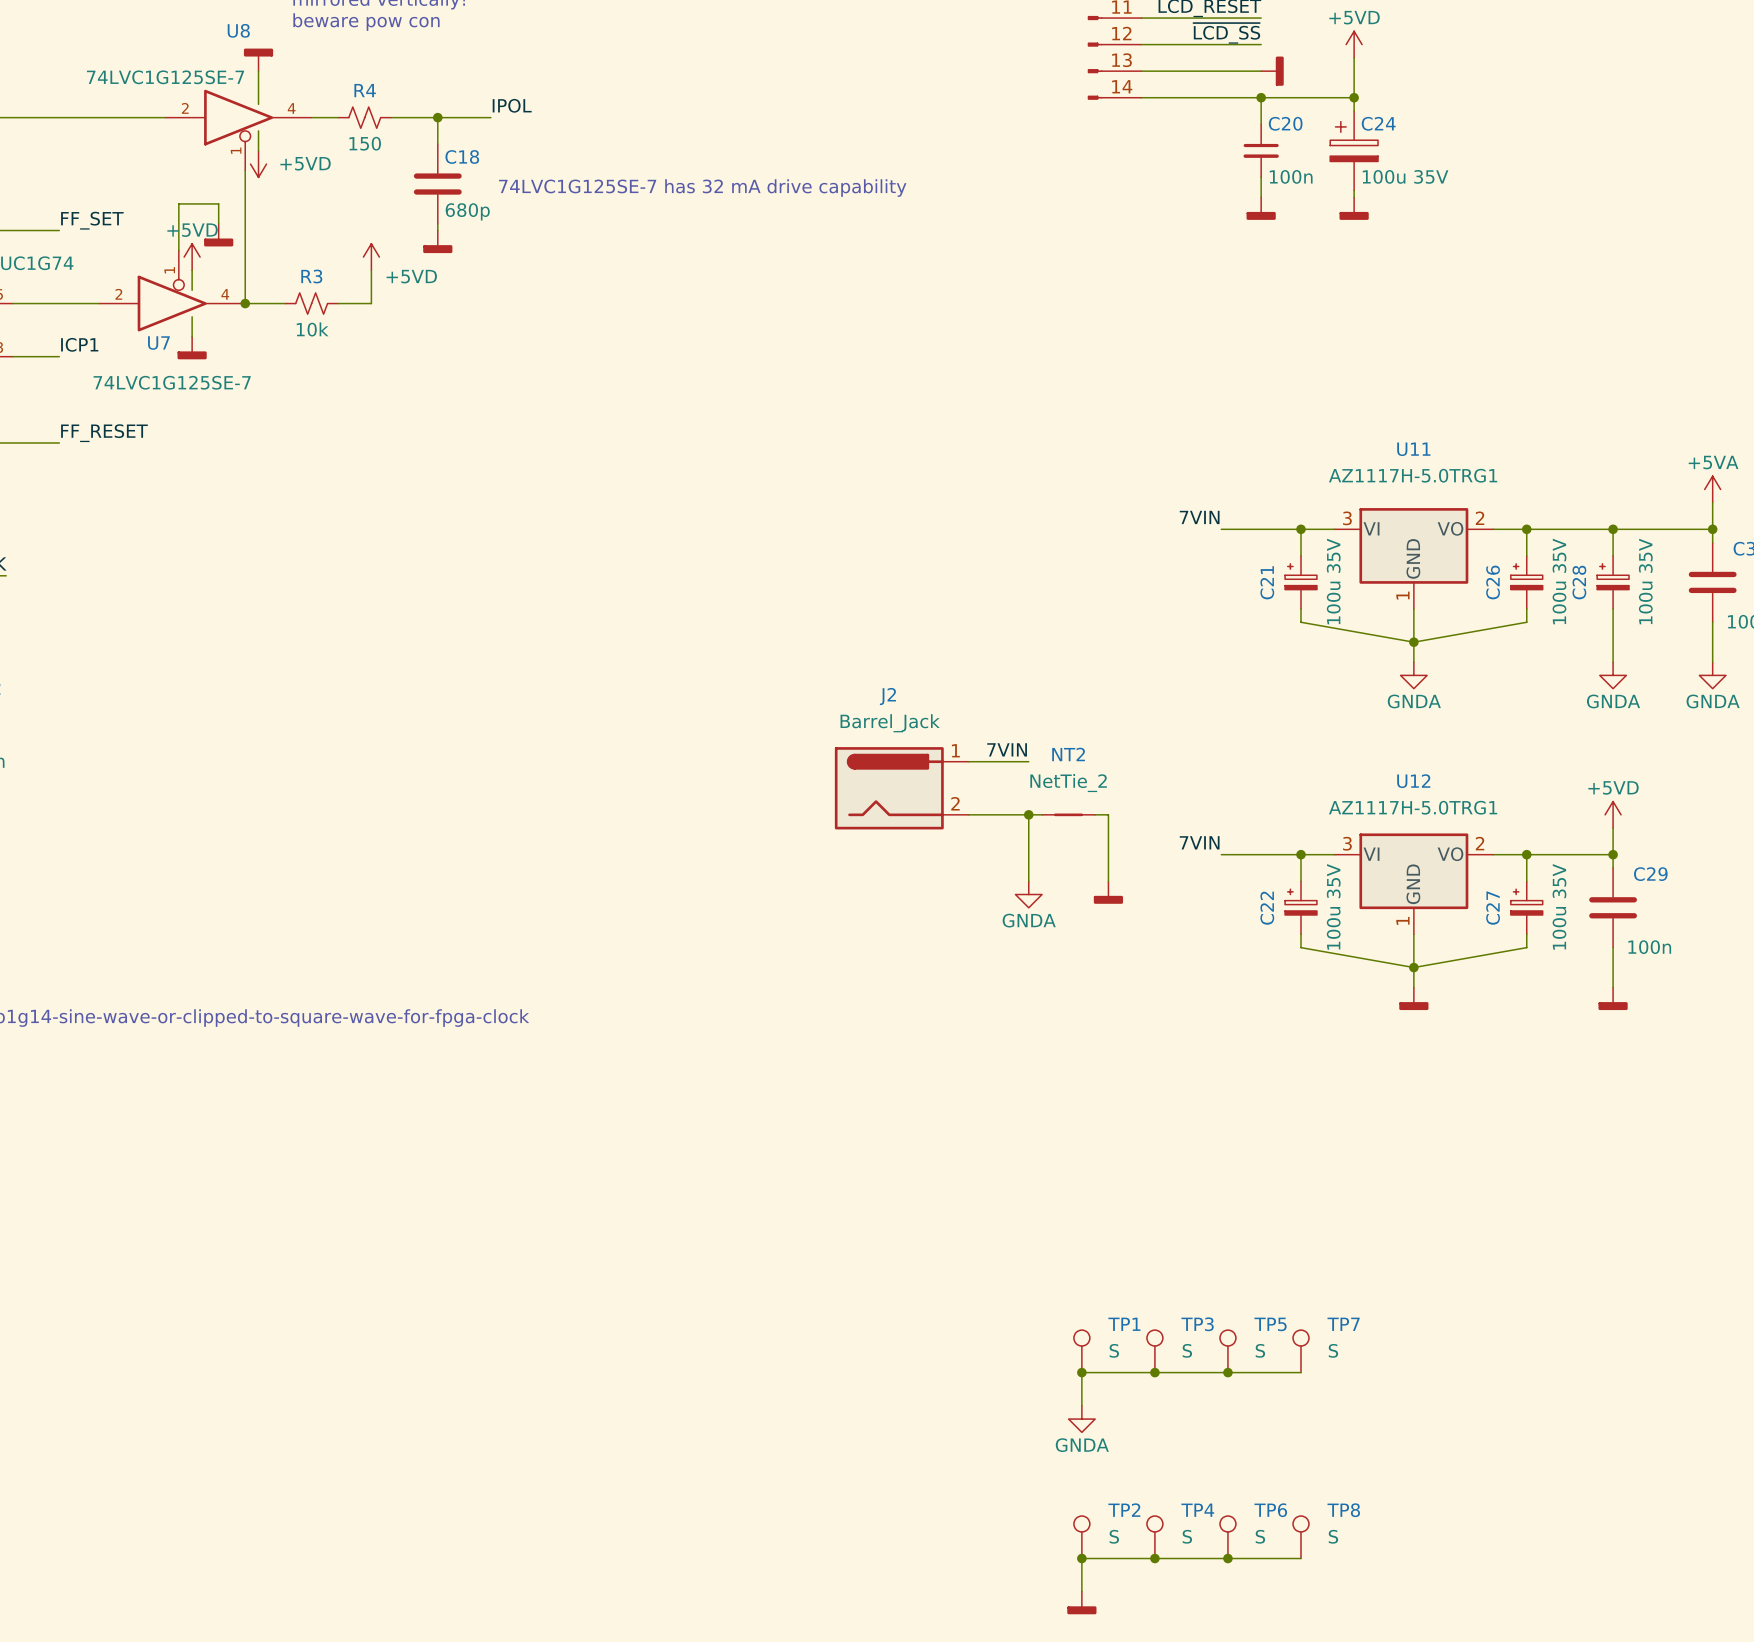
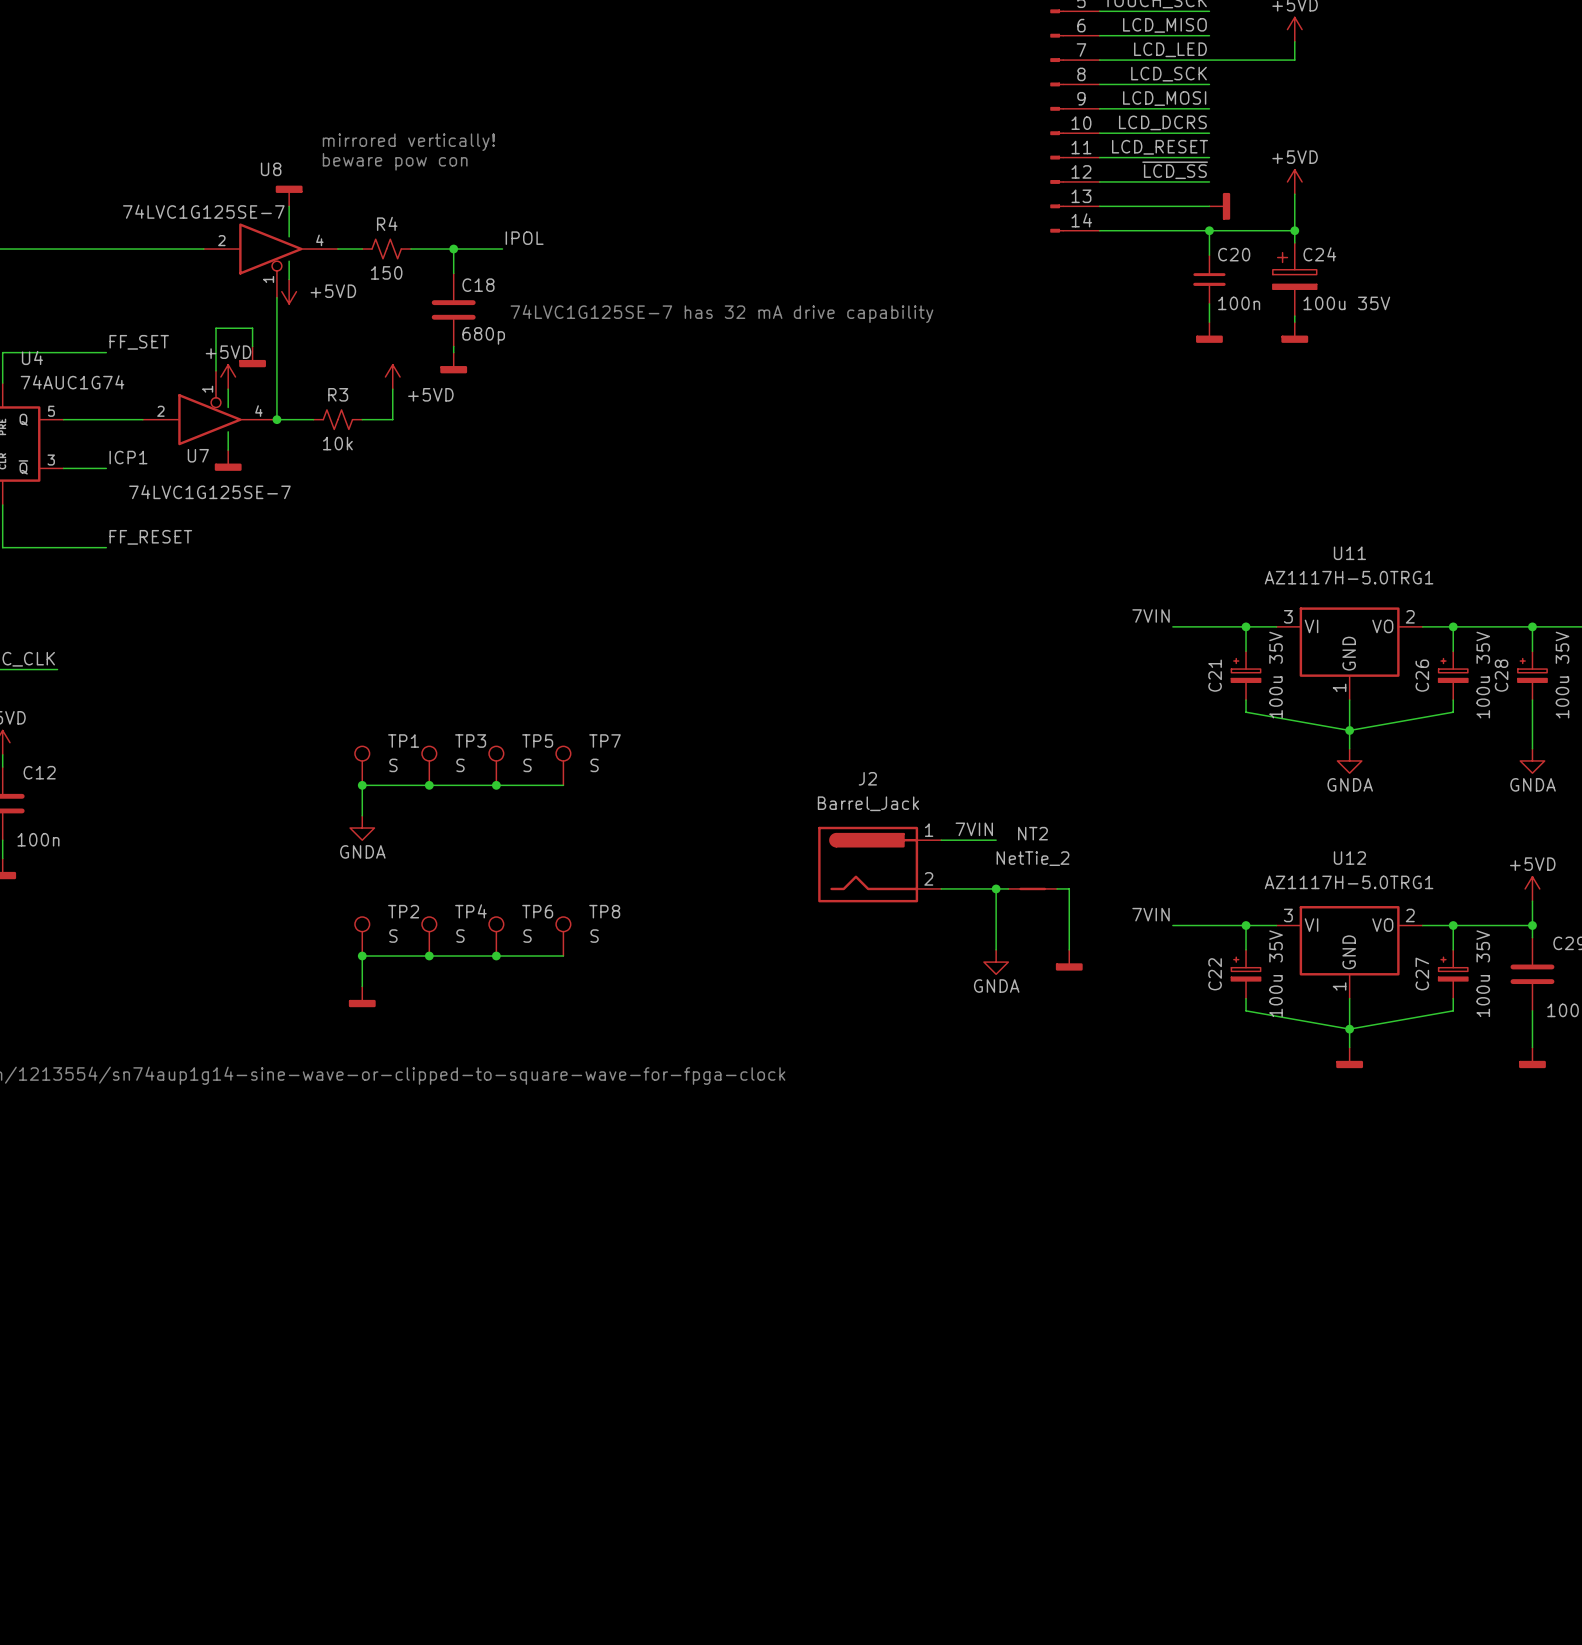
junction: none -> (362, 785)
junction: none -> (429, 785)
junction: none -> (496, 785)
wire: none -> (563, 785) (362, 785) (362, 815)
power symbol: none -> GNDA (362, 828)
junction: none -> (362, 956)
junction: none -> (429, 956)
junction: none -> (496, 956)
wire: none -> (563, 956) (362, 956) (362, 986)
power symbol: none -> (362, 996)
TP1 position: (1081, 1351) -> (362, 765)
TP3 position: (1154, 1351) -> (429, 765)
TP5 position: (1227, 1351) -> (496, 765)
TP7 position: (1300, 1351) -> (563, 765)
junction: (1081, 1372) -> none
junction: (1154, 1372) -> none
junction: (1227, 1372) -> none
wire: (1300, 1372) (1081, 1372) (1081, 1405) -> none
power symbol: GNDA (1081, 1419) -> none
TP2 position: (1081, 1537) -> (362, 936)
TP4 position: (1154, 1537) -> (429, 936)
TP6 position: (1227, 1537) -> (496, 936)
TP8 position: (1300, 1537) -> (563, 936)
junction: (1081, 1558) -> none
junction: (1154, 1558) -> none
junction: (1227, 1558) -> none
wire: (1300, 1558) (1081, 1558) (1081, 1591) -> none
power symbol: (1081, 1603) -> none

